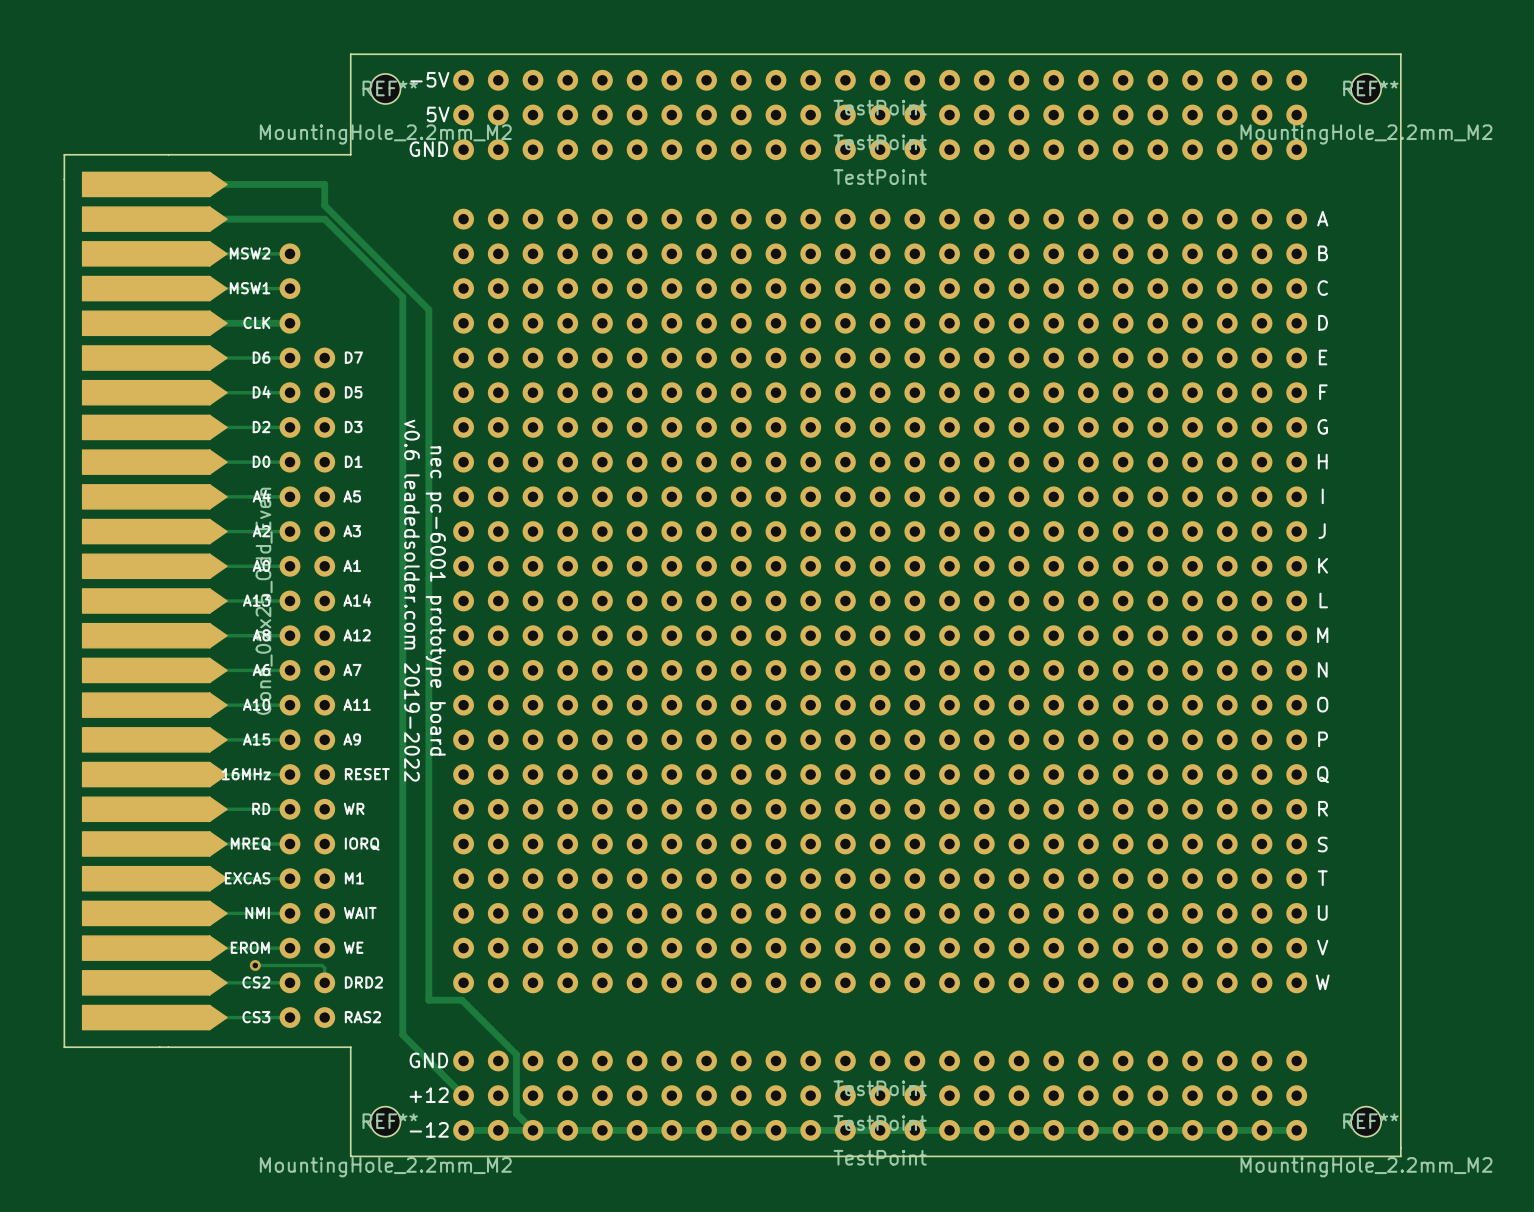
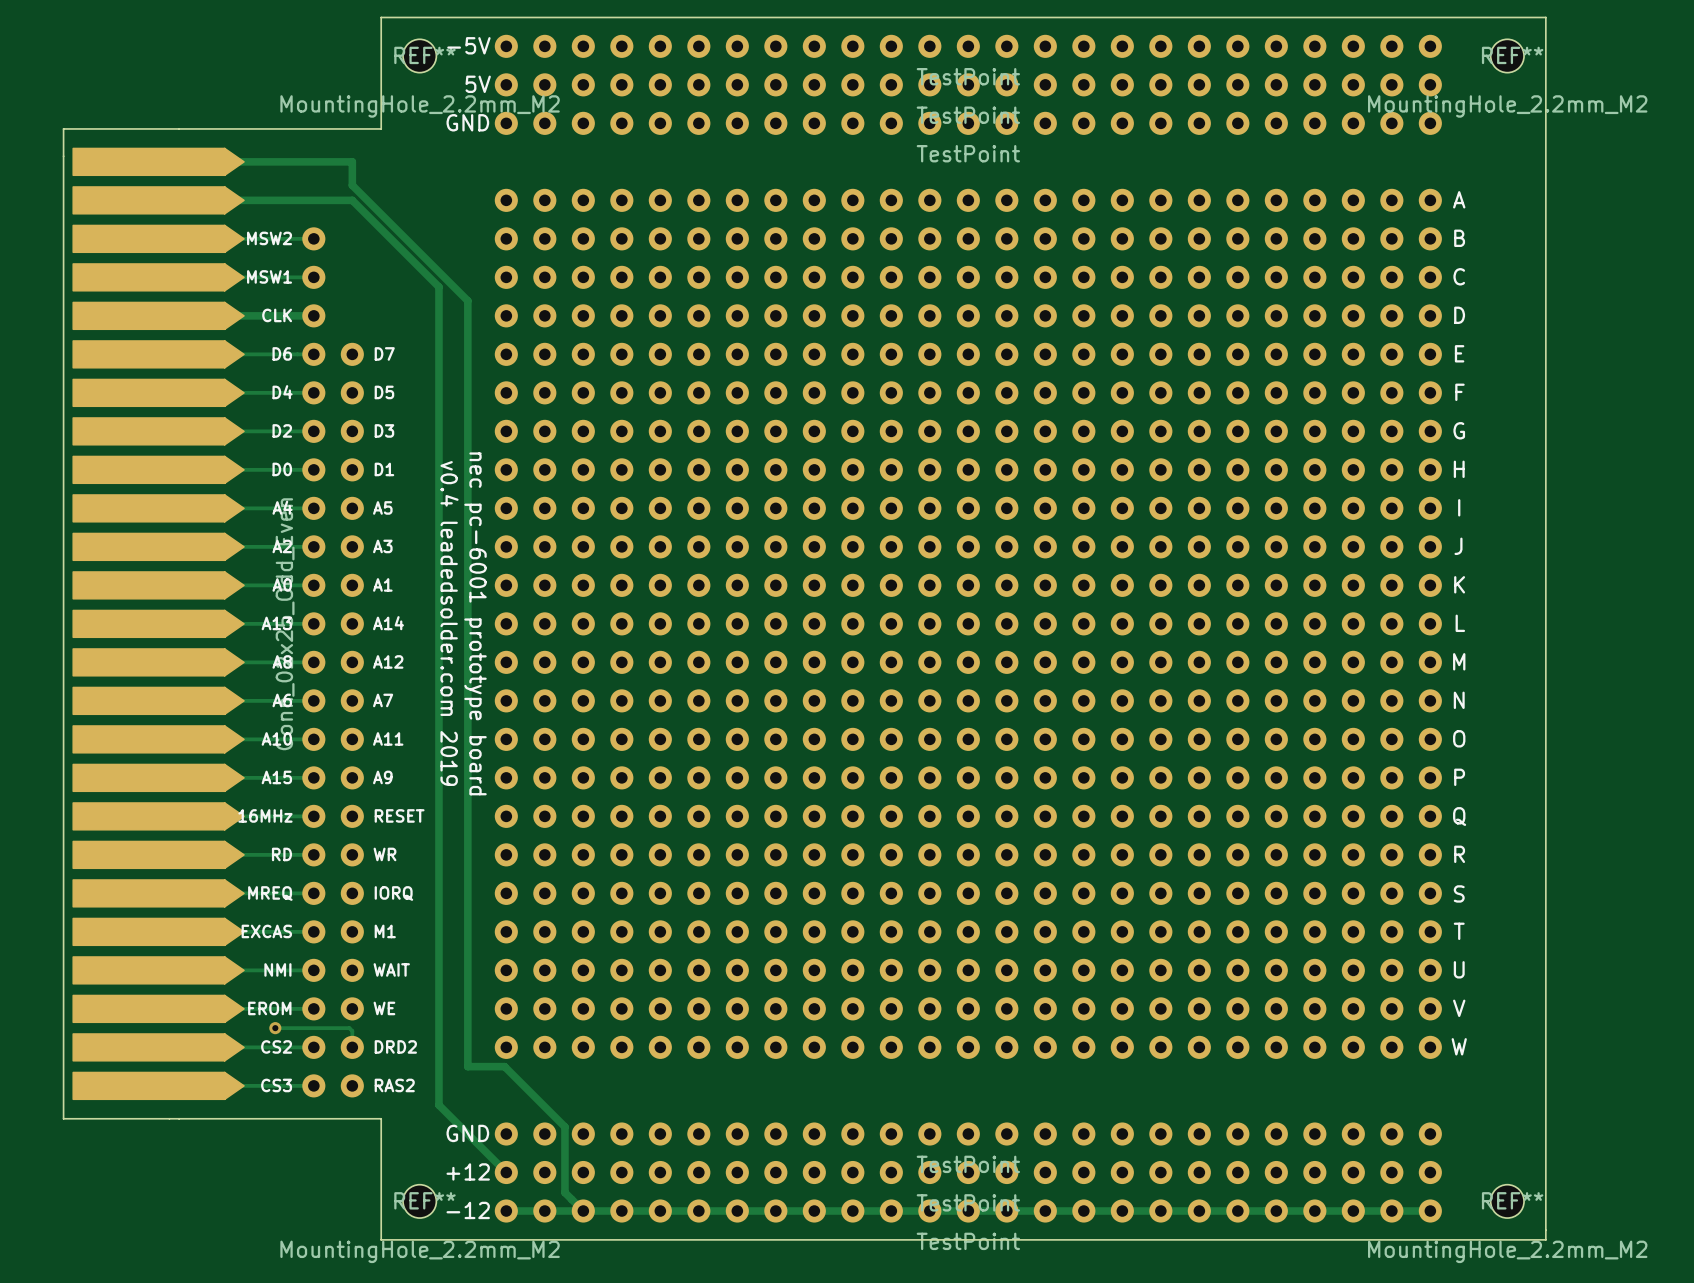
part footprint: [81, 171, 228, 1031] -> [72, 147, 245, 1101]
text: v0.6 leadedsolder.com 2019-2022 (412, 600) -> v0.4 leadedsolder.com 2019 (449, 623)

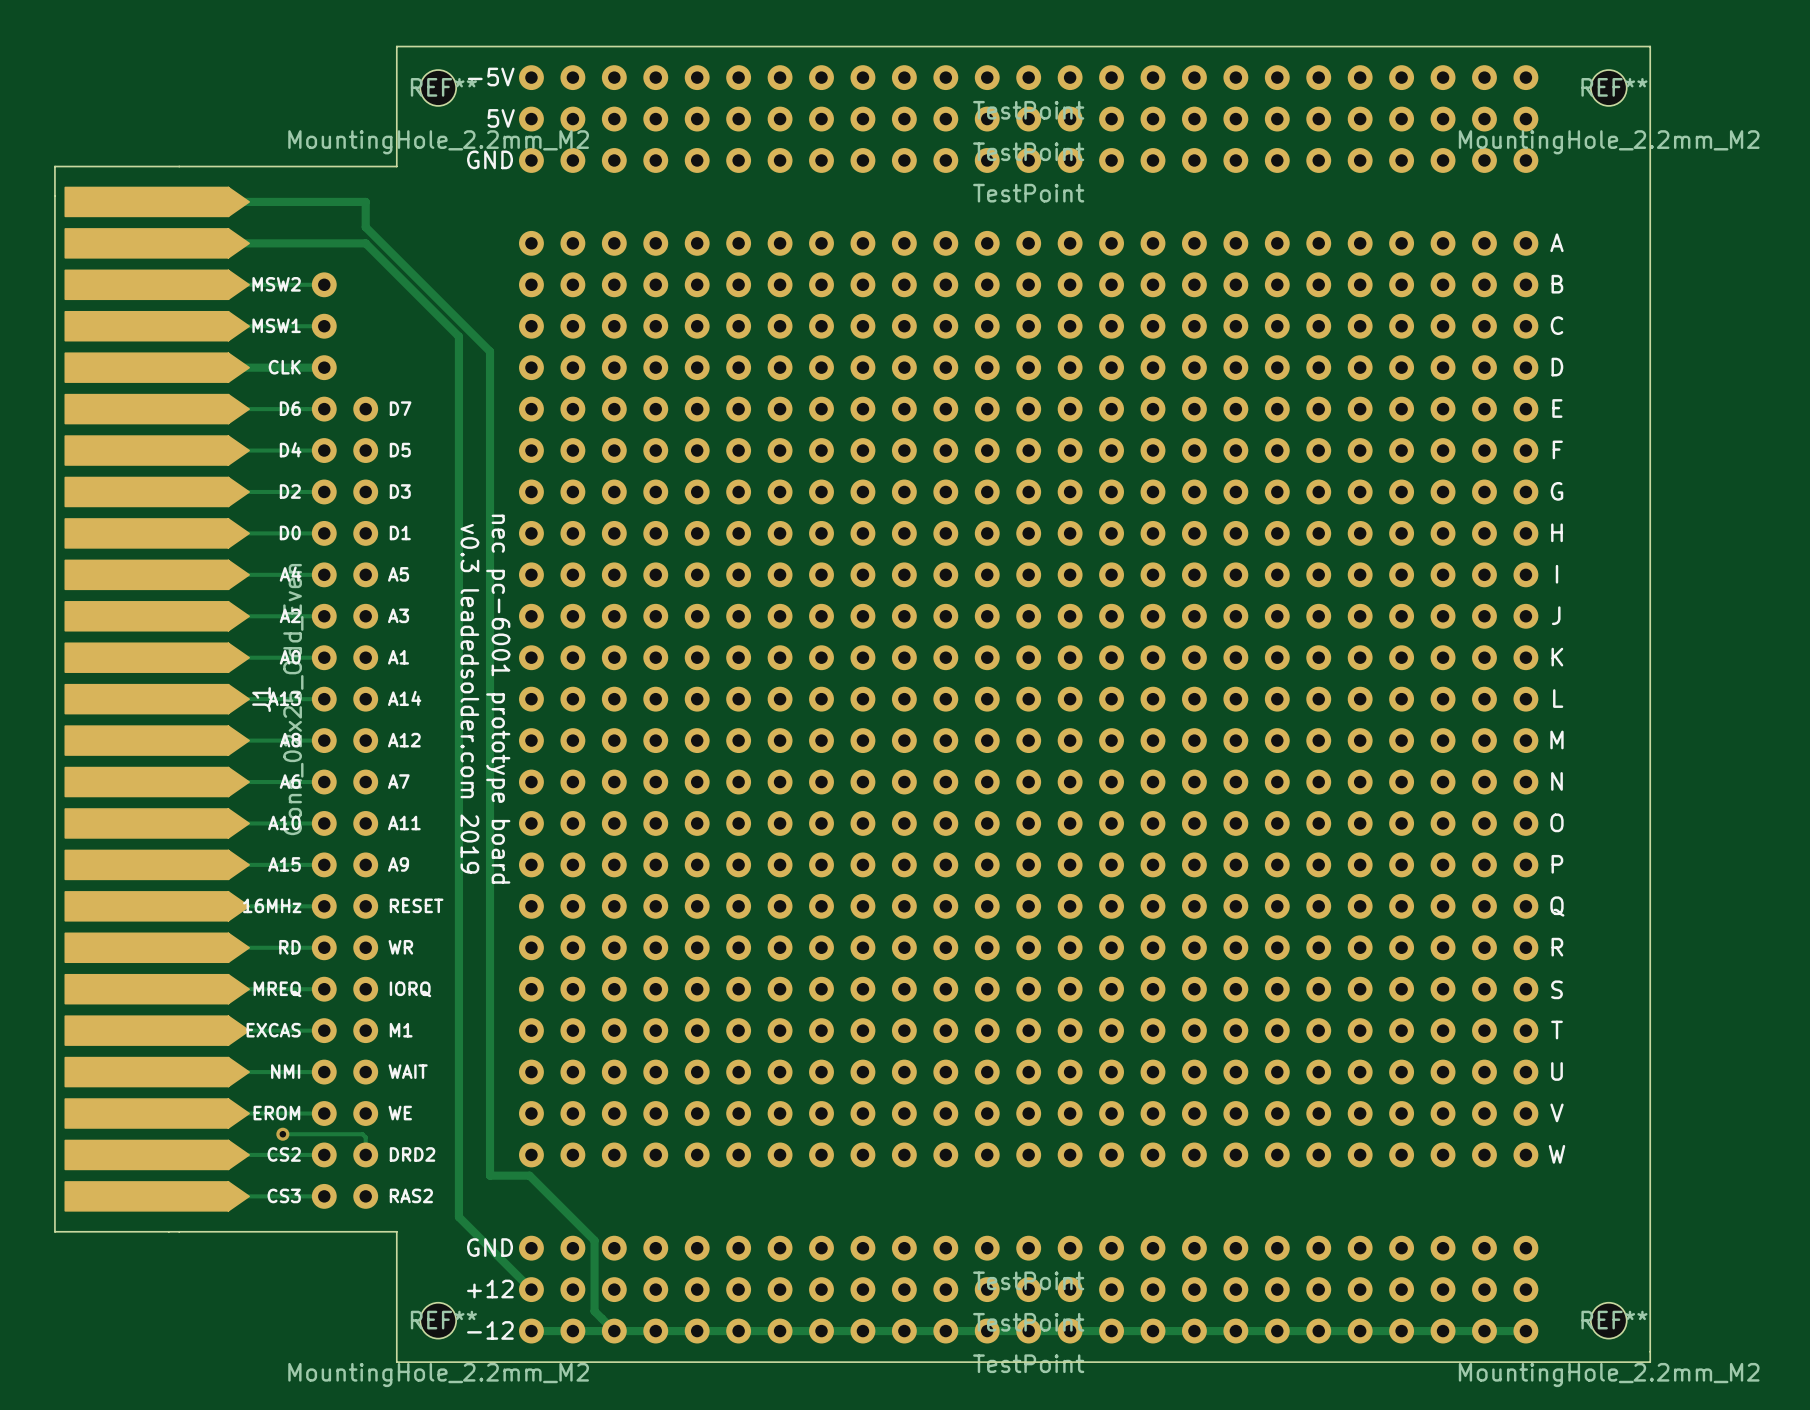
text: v0.4 leadedsolder.com 2019 (449, 623) -> v0.3 leadedsolder.com 2019 (469, 698)
J1 name: none -> J1 (261, 699)

